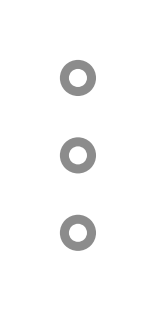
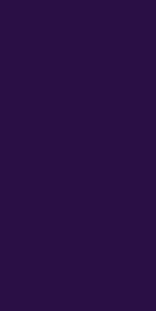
part: (77, 155) -> none

